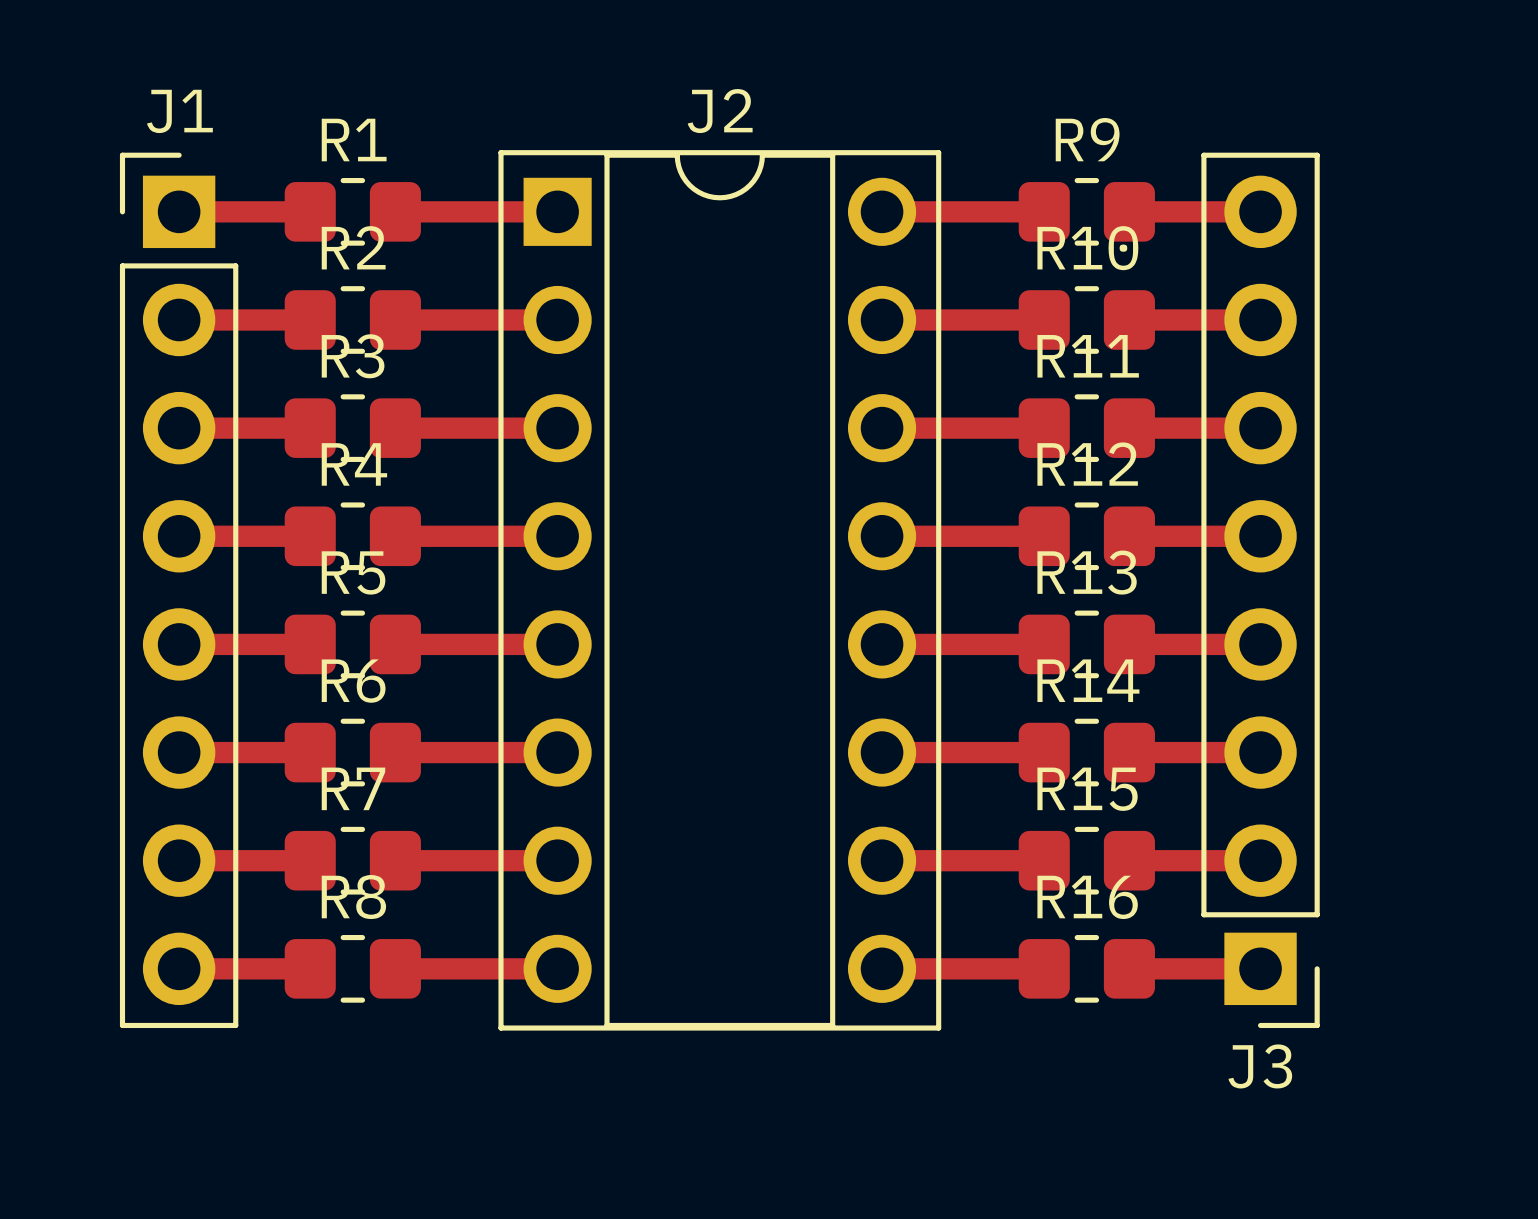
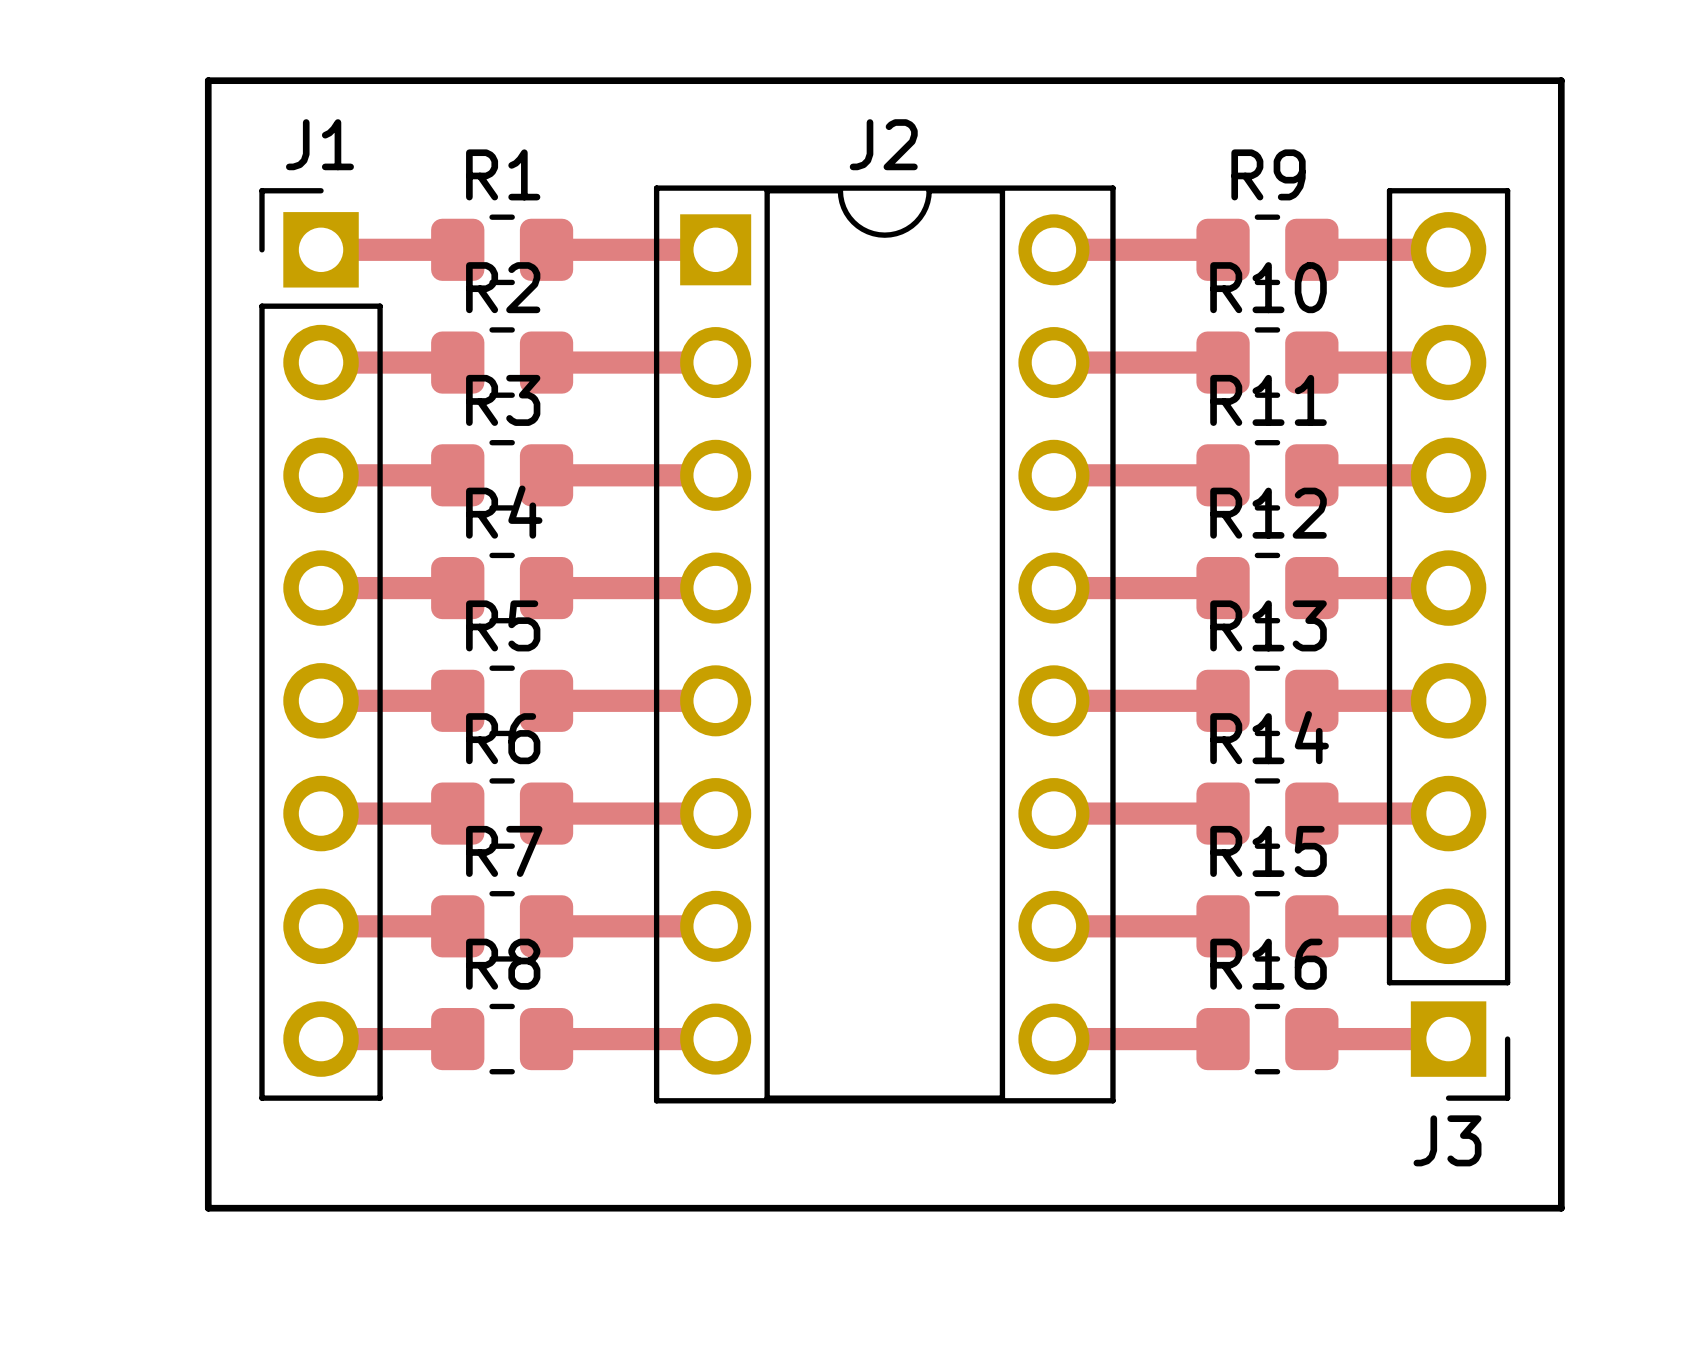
board edge: none -> (208, 80) (208, 1208) (1561, 1208) (1561, 80) (208, 80)

